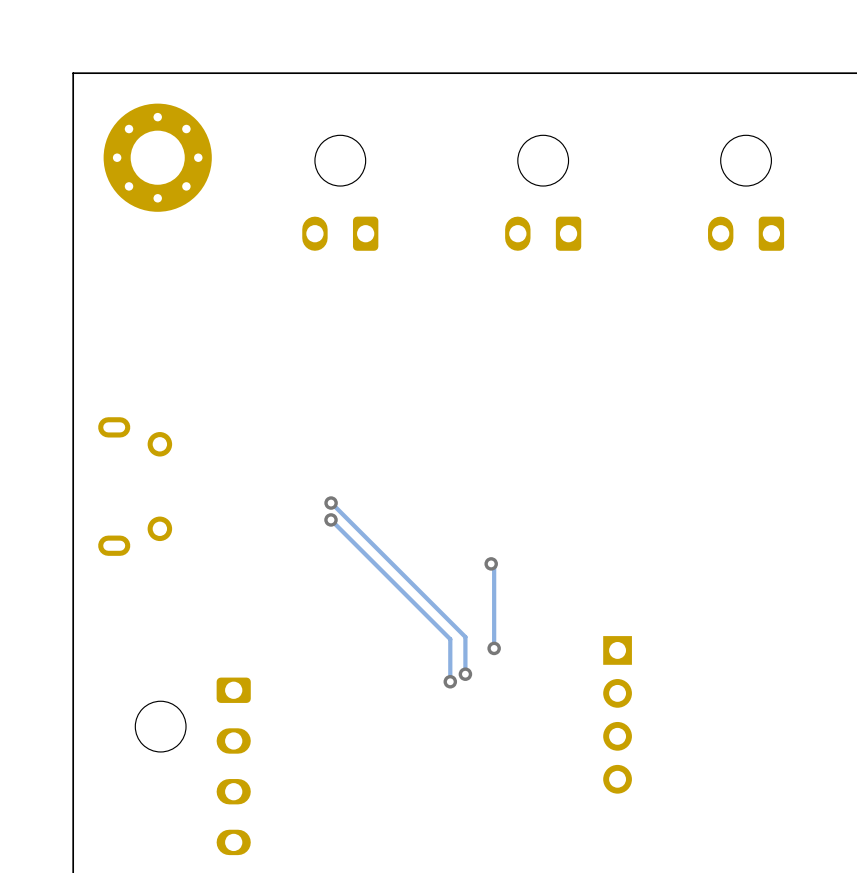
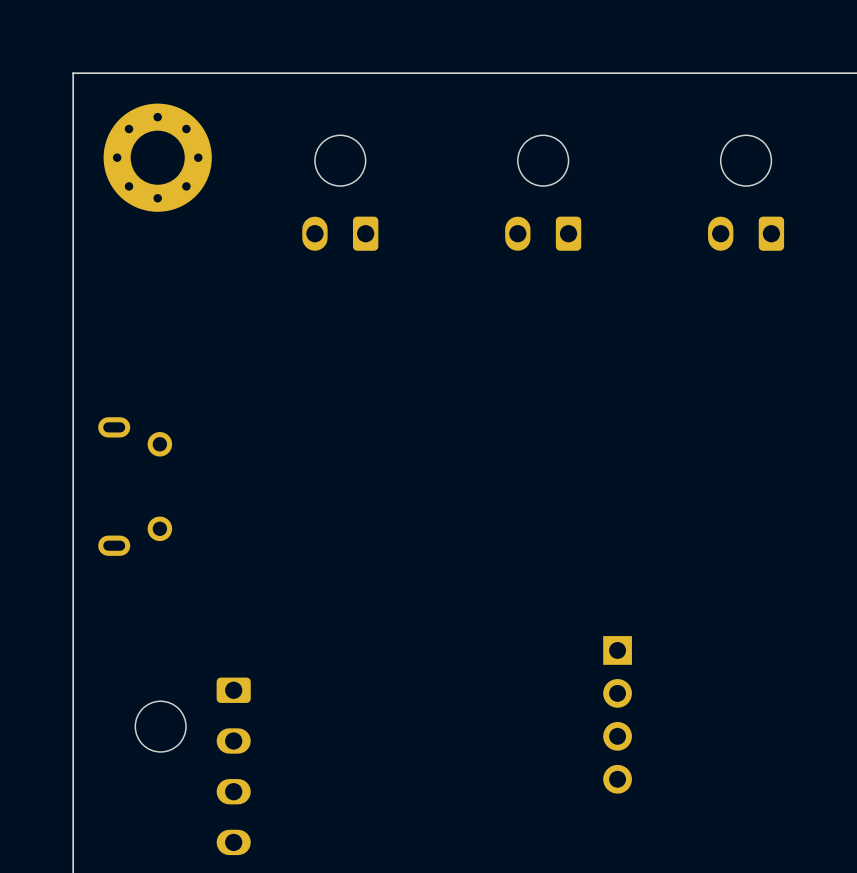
track: (331, 503) (465, 637) (465, 674) -> none
via: (331, 503) -> none
track: (331, 519) (450, 639) (450, 681) -> none
via: (331, 519) -> none
track: (491, 563) (494, 566) (494, 648) -> none
via: (491, 563) -> none
via: (494, 648) -> none
via: (465, 674) -> none
via: (450, 681) -> none

